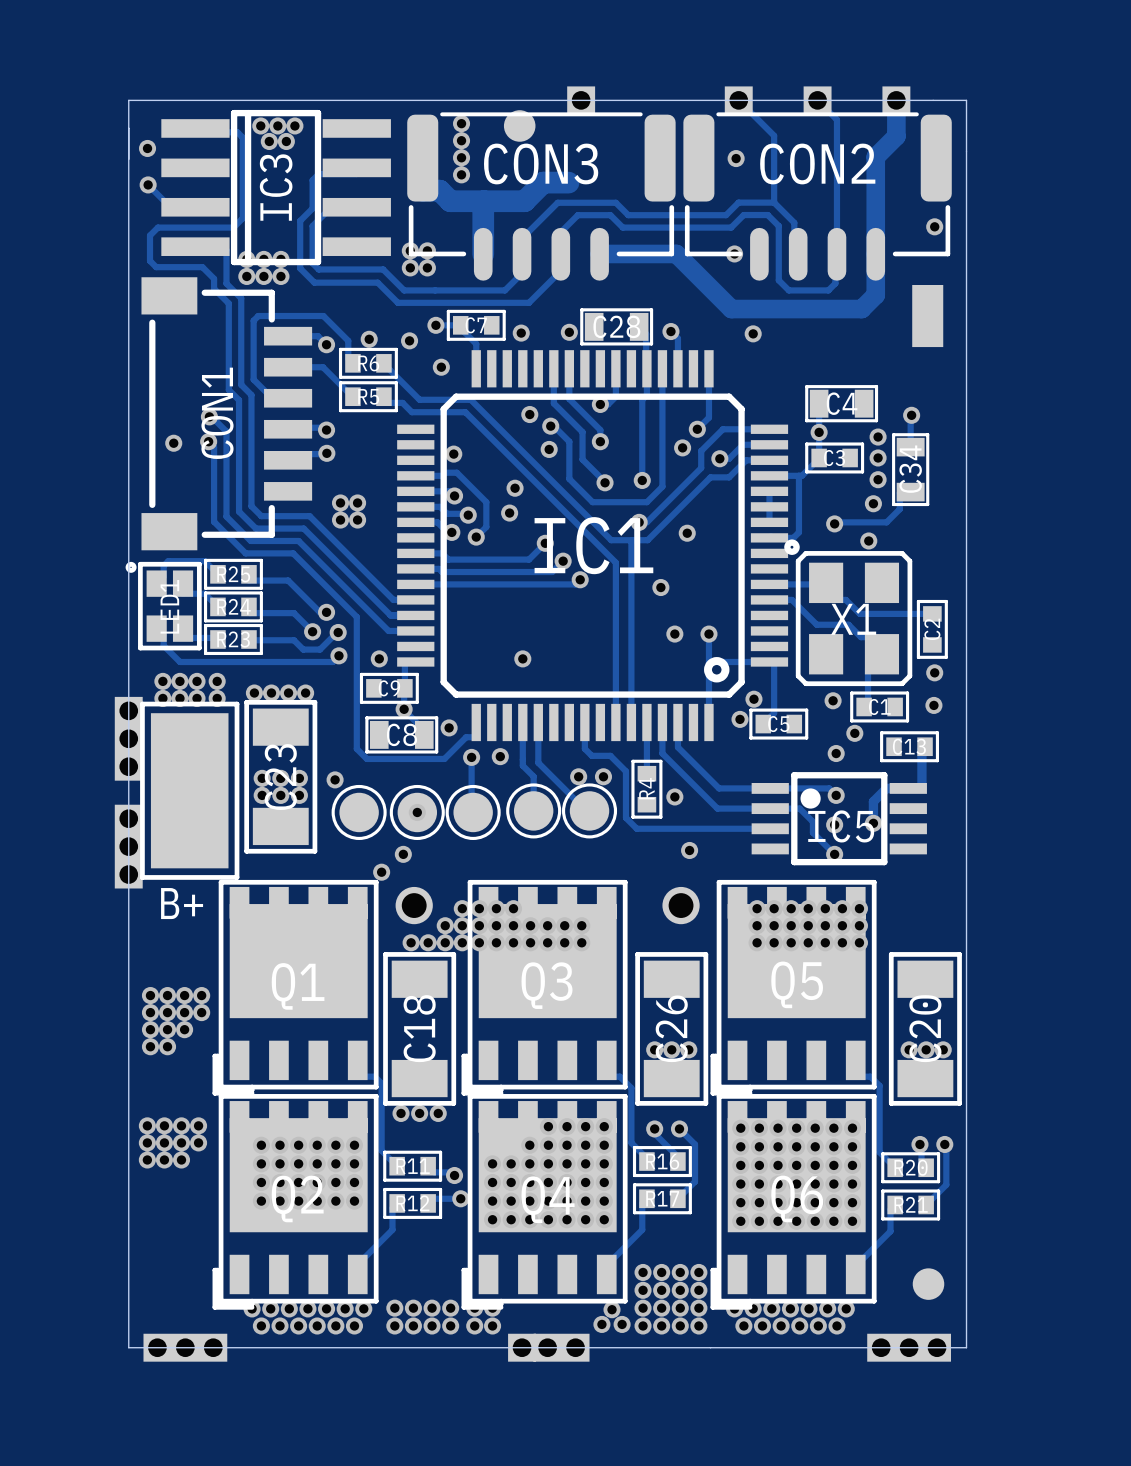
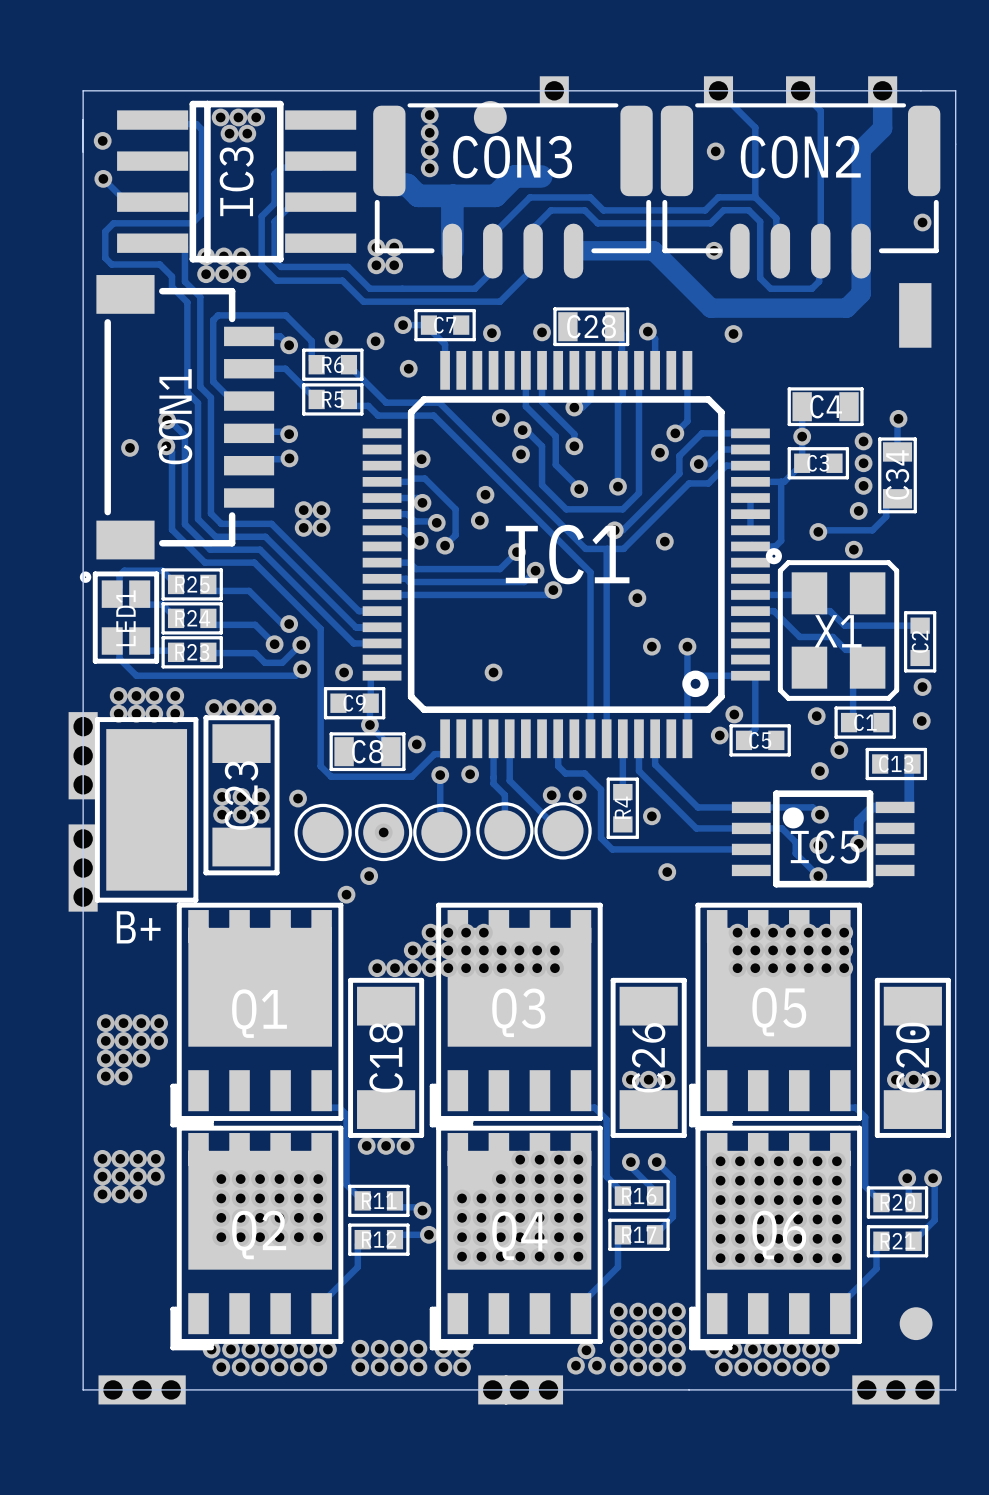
part: (414, 905) -> none
part: (681, 905) -> none

